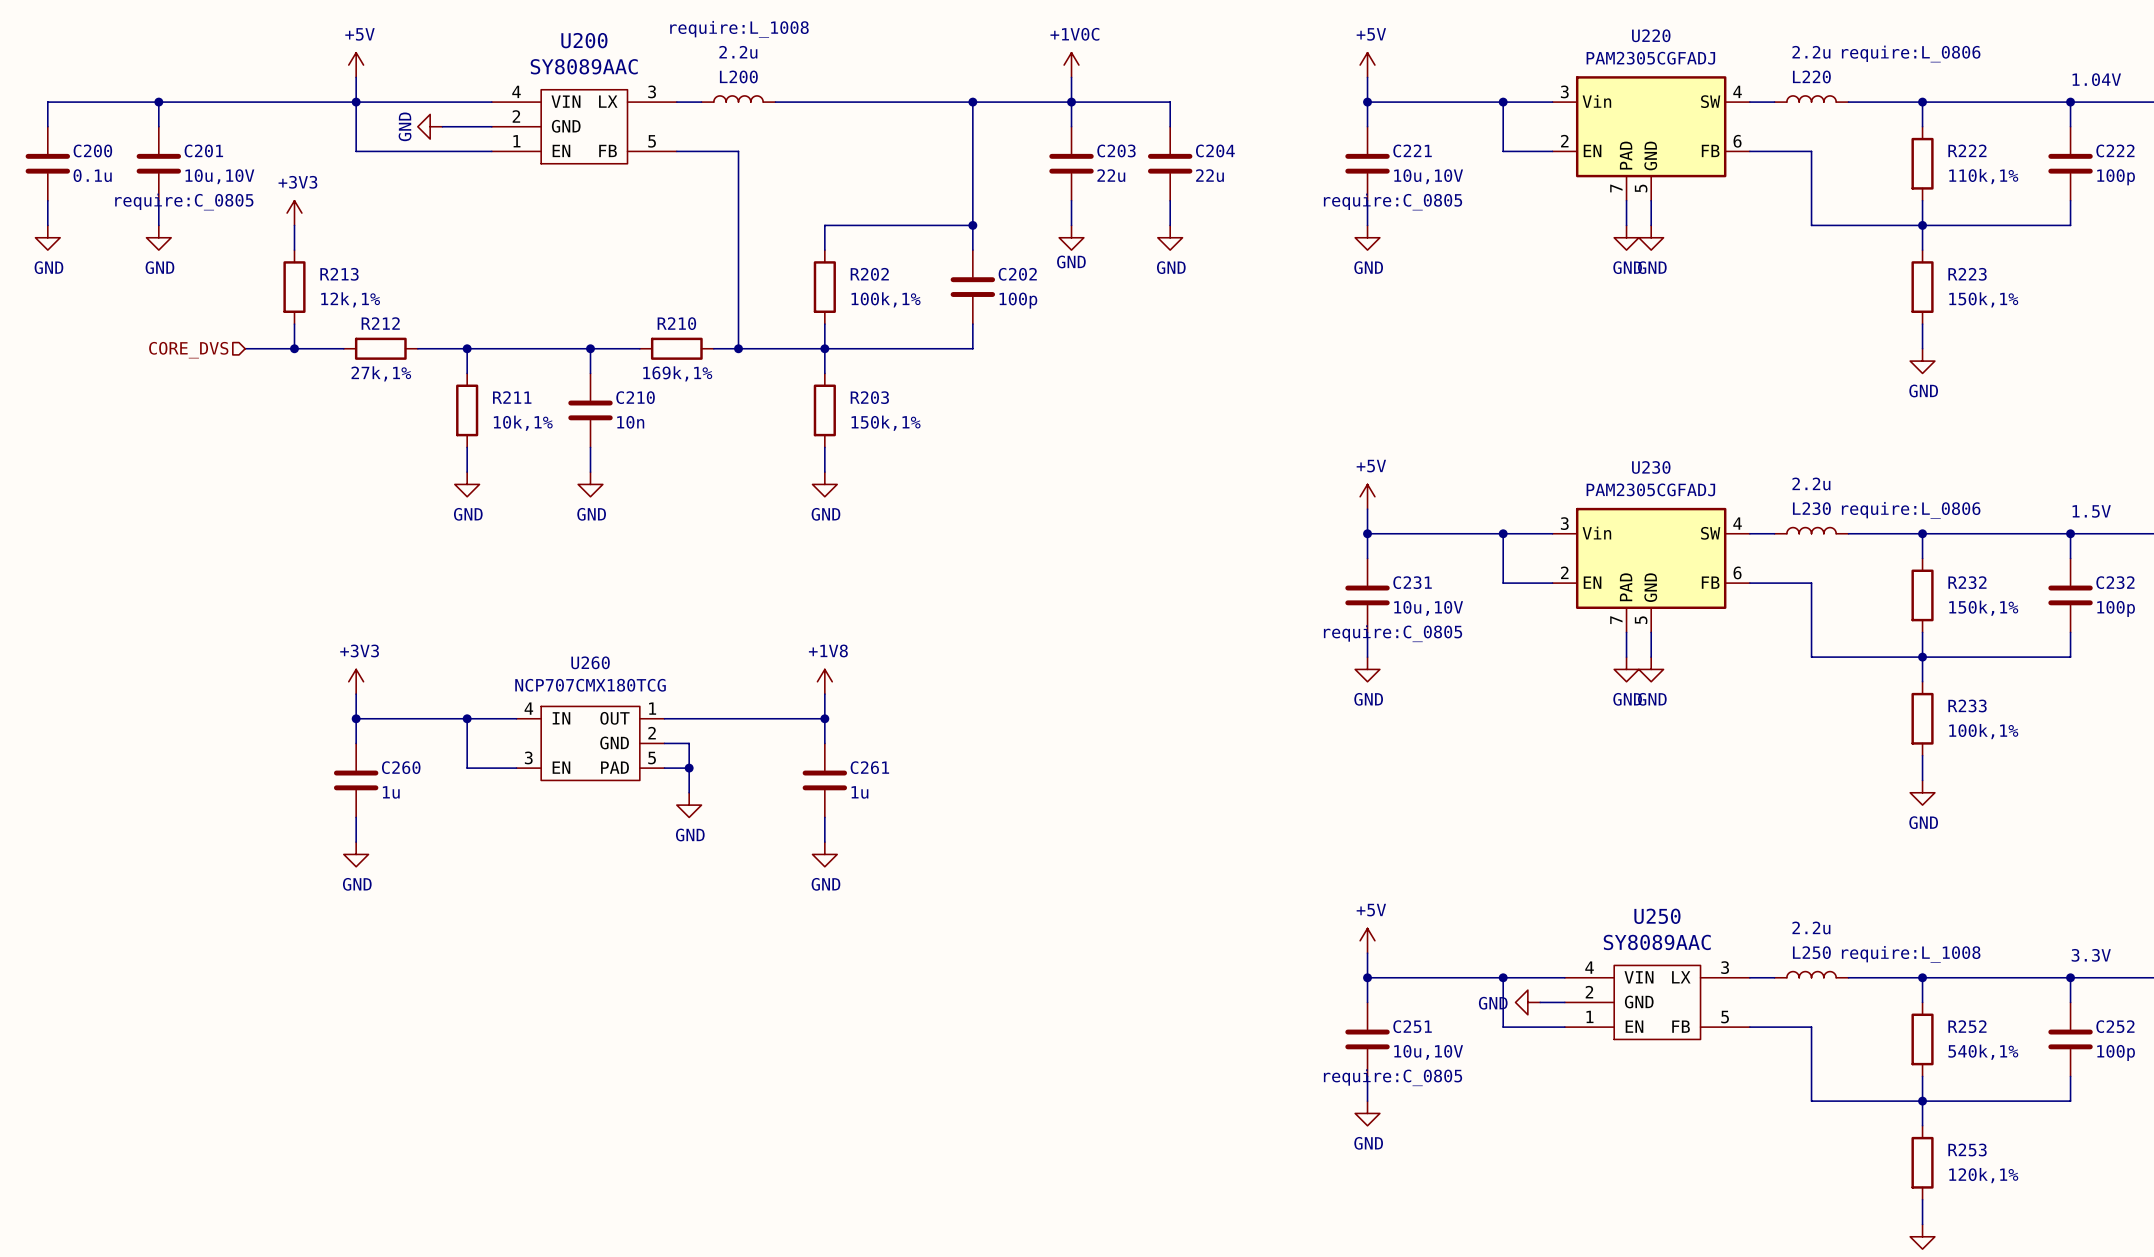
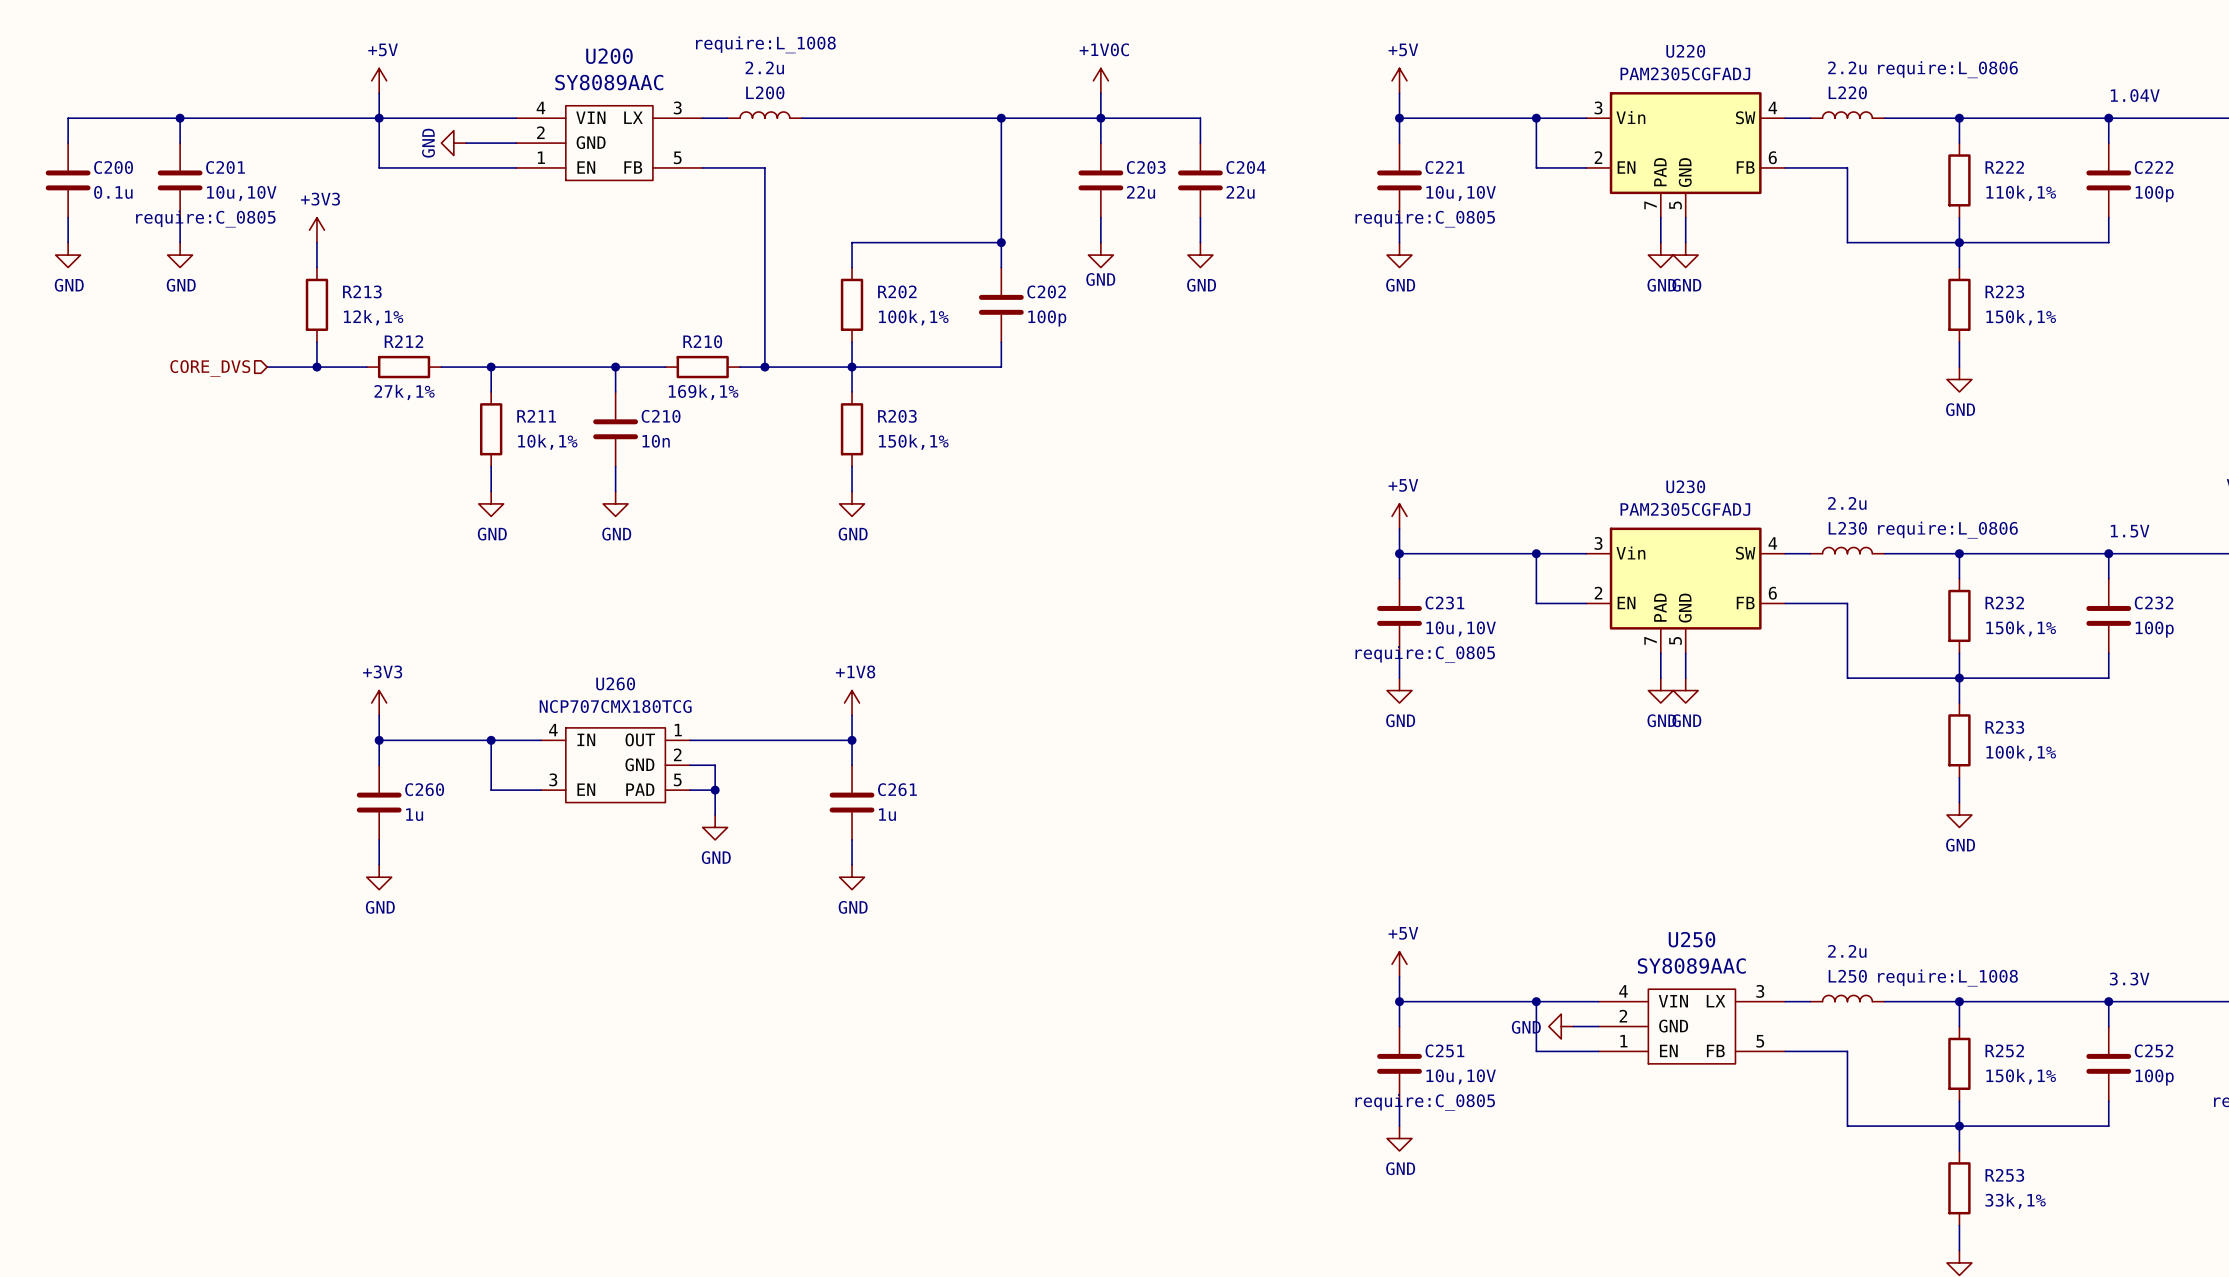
R252 value: 540k,1% (1983, 1052) -> 150k,1% (2021, 1076)
R253 value: 120k,1% (1983, 1175) -> 33k,1% (2015, 1201)

